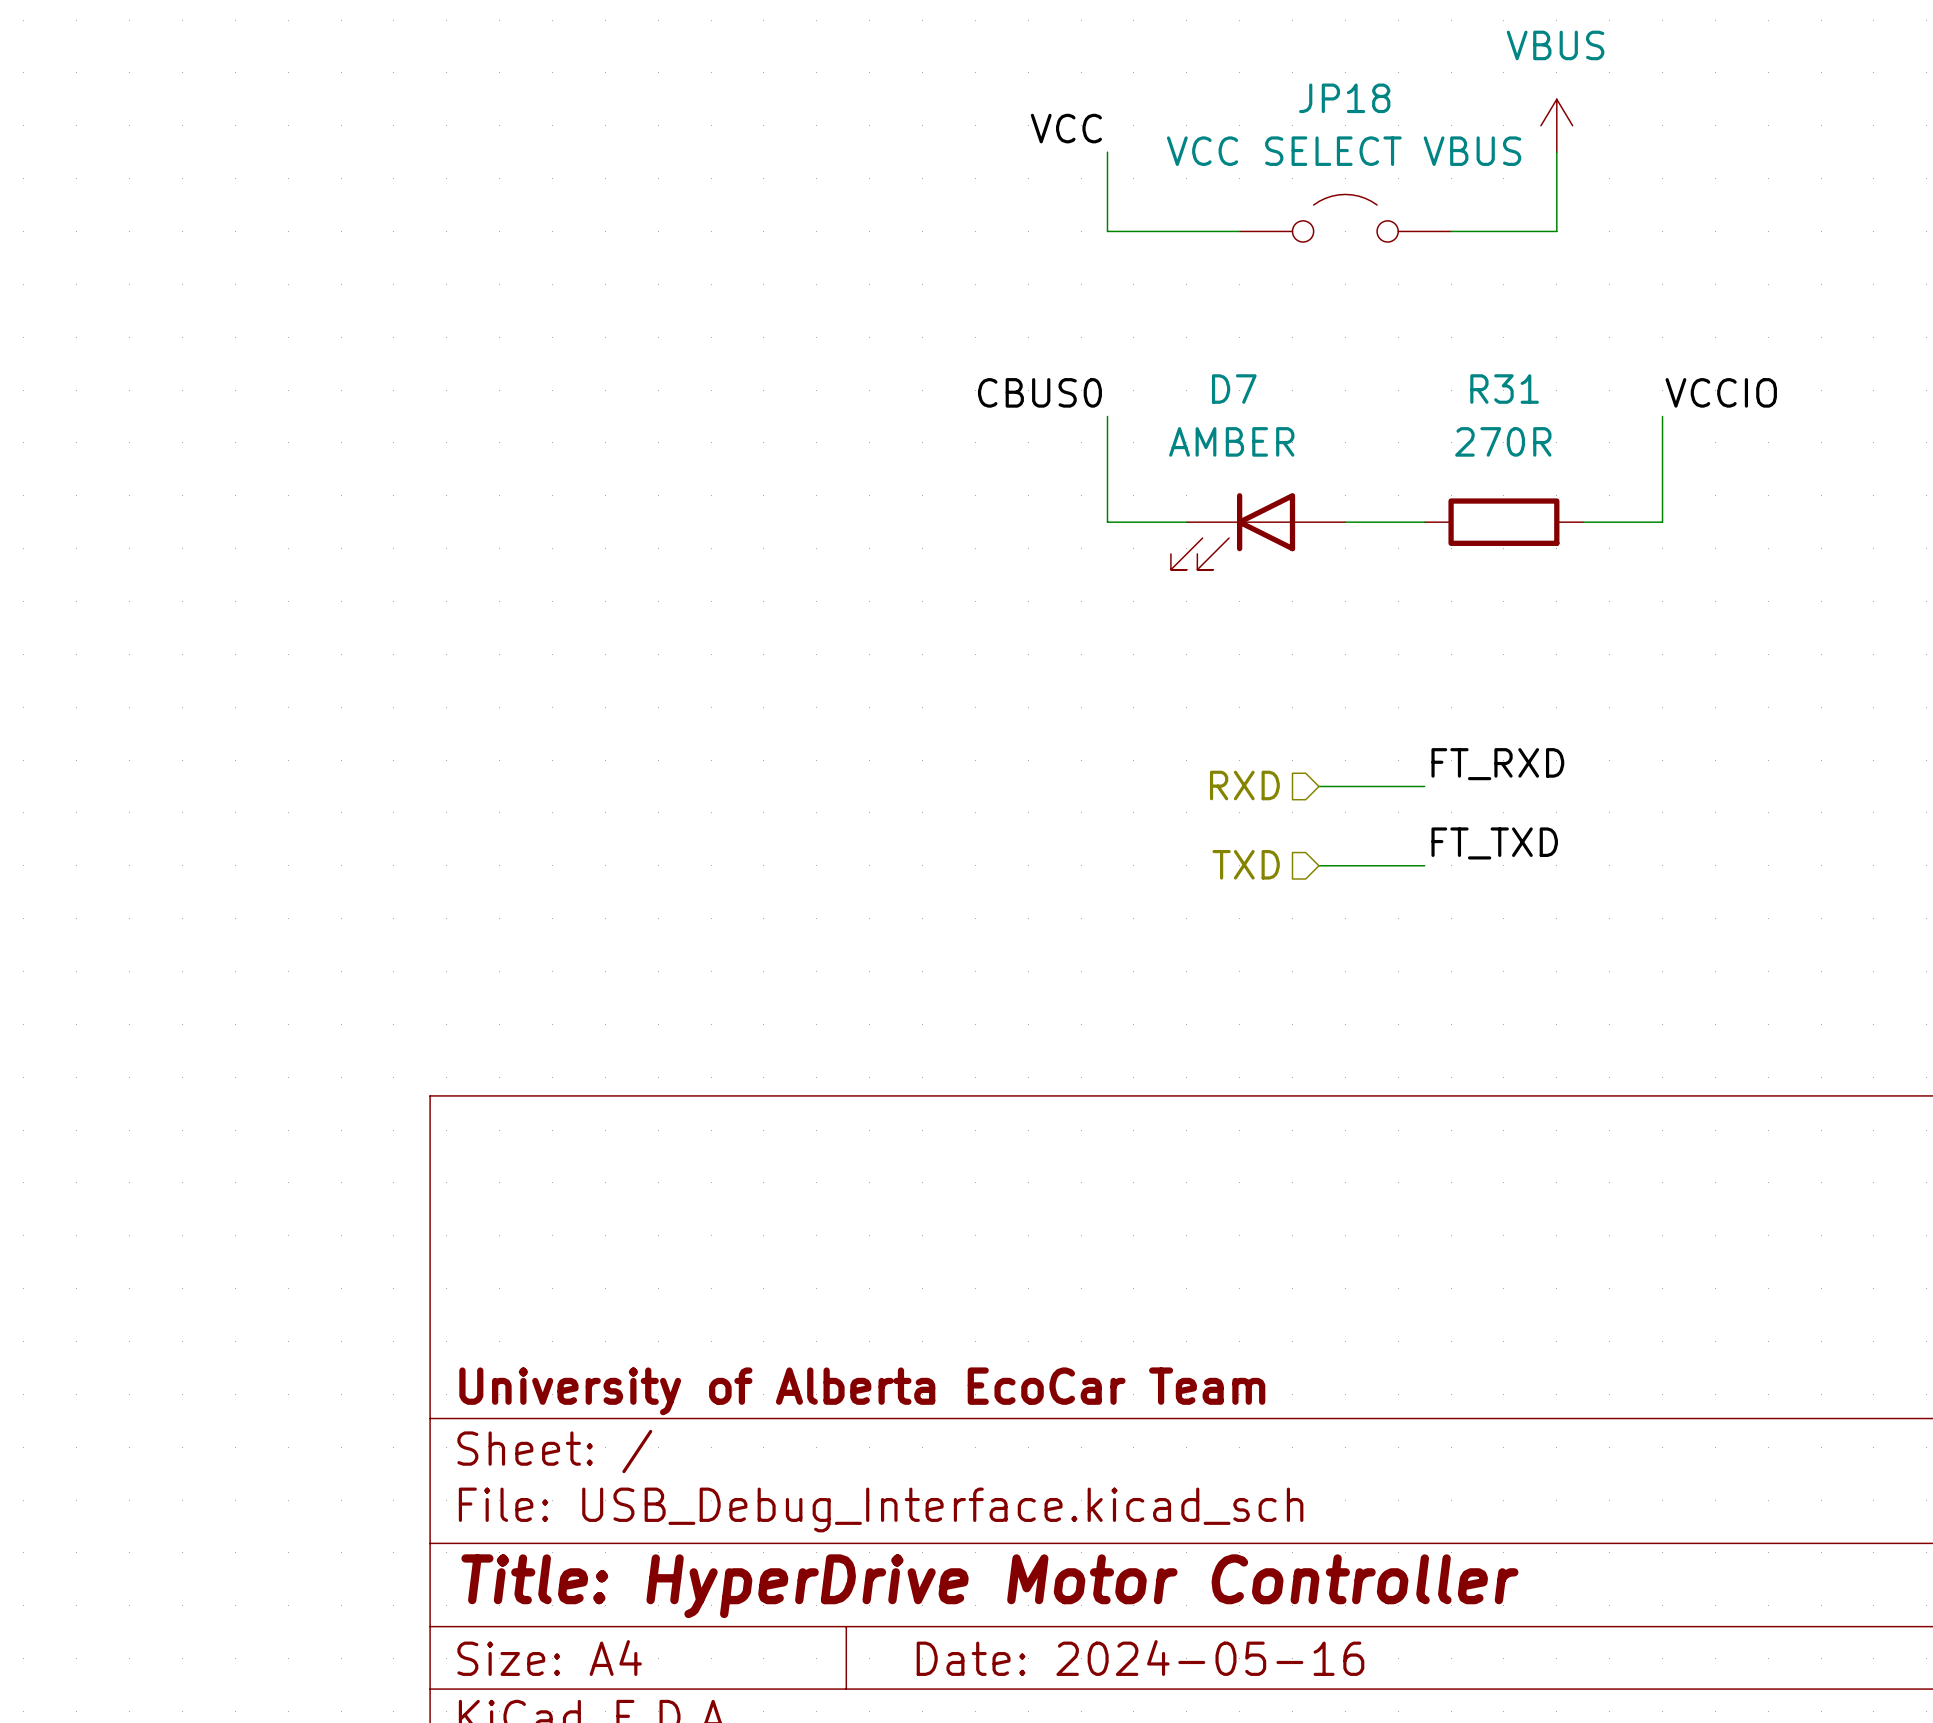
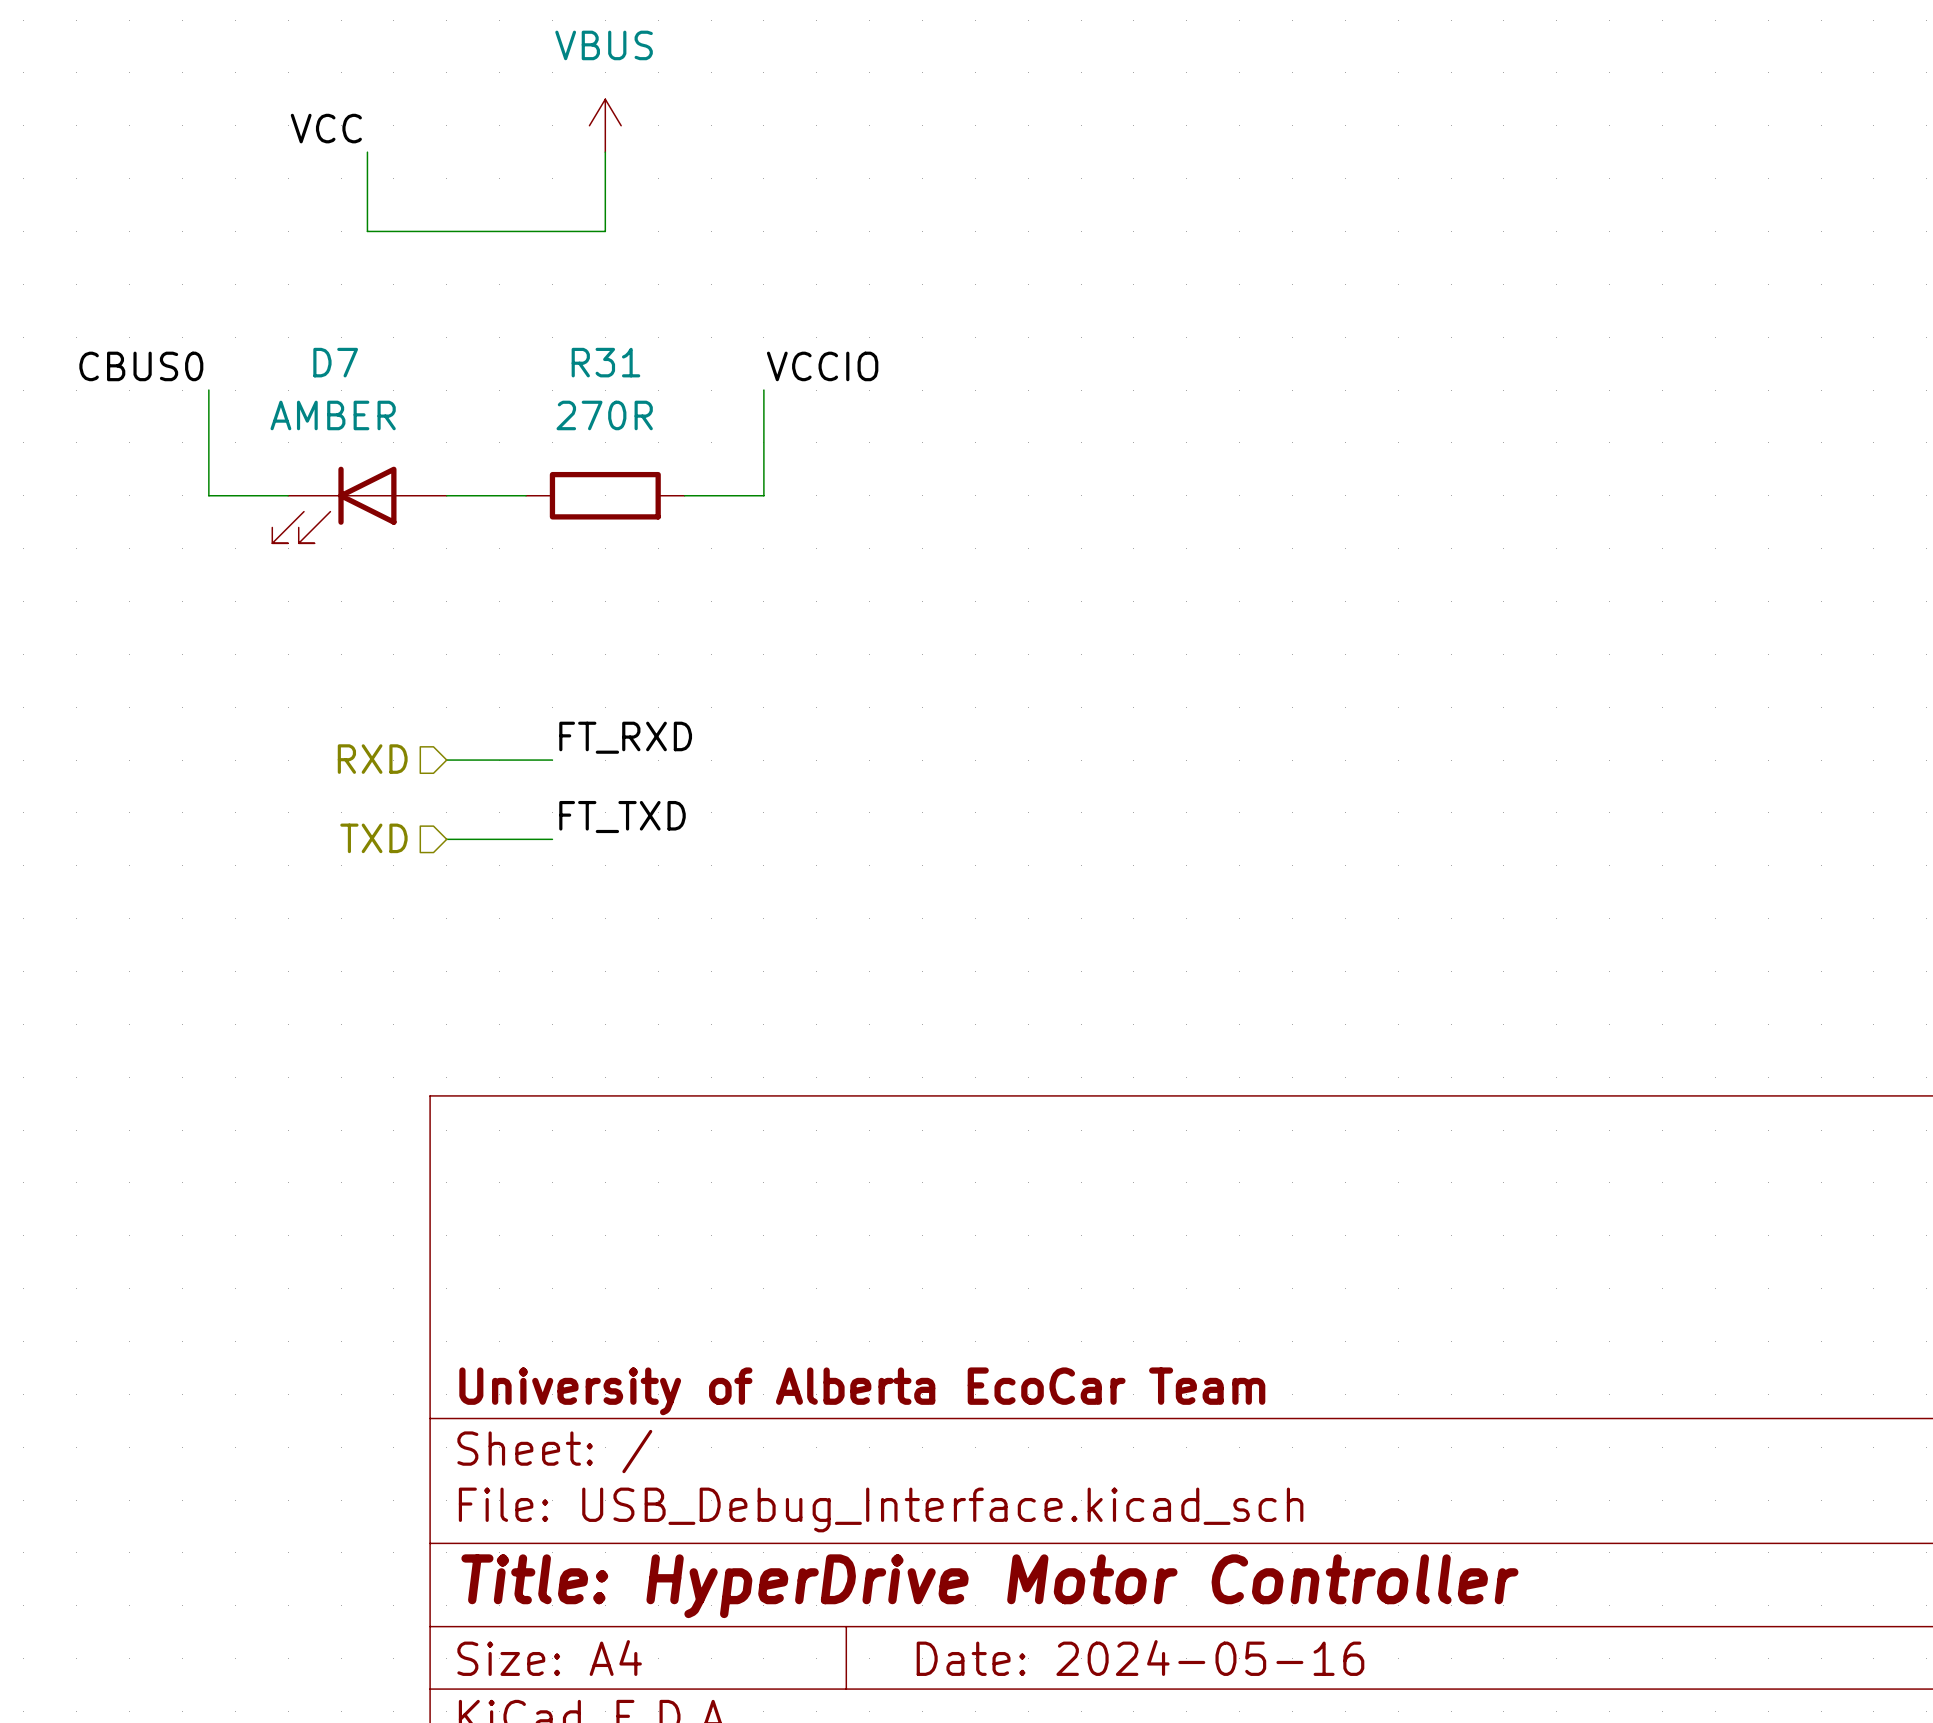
power symbol: none -> VBUS (605, 125)
power symbol: VBUS (1556, 125) -> none
label: none -> VCC (326, 128)
label: VCC (1066, 128) -> none
wire: none -> (367, 152) (367, 231) (605, 231) (605, 152)
wire: (1107, 152) (1107, 231) (1239, 231) -> none
wire: (1556, 152) (1556, 231) (1451, 231) -> none
JP18: VCC SELECT VBUS (1345, 218) -> none
label: none -> CBUS0 (141, 366)
label: none -> VCCIO (822, 366)
wire: none -> (208, 390) (208, 495) (288, 495)
wire: none -> (763, 390) (763, 495) (684, 495)
label: CBUS0 (1039, 392) -> none
label: VCCIO (1721, 392) -> none
wire: (1107, 416) (1107, 522) (1186, 522) -> none
wire: (1662, 416) (1662, 522) (1583, 522) -> none
wire: none -> (446, 495) (526, 495)
wire: (1345, 522) (1424, 522) -> none
R31 position: (1503, 522) -> (605, 495)
D7 position: (1258, 531) -> (359, 505)
label: none -> FT_RXD (625, 737)
hierarchical label: none -> RXD (372, 759)
wire: none -> (446, 760) (552, 760)
label: FT_RXD (1497, 764) -> none
hierarchical label: RXD (1244, 785) -> none
wire: (1318, 786) (1424, 786) -> none
label: none -> FT_TXD (622, 817)
hierarchical label: none -> TXD (373, 838)
wire: none -> (446, 839) (552, 839)
label: FT_TXD (1494, 843) -> none
hierarchical label: TXD (1246, 864) -> none
wire: (1318, 865) (1424, 865) -> none

